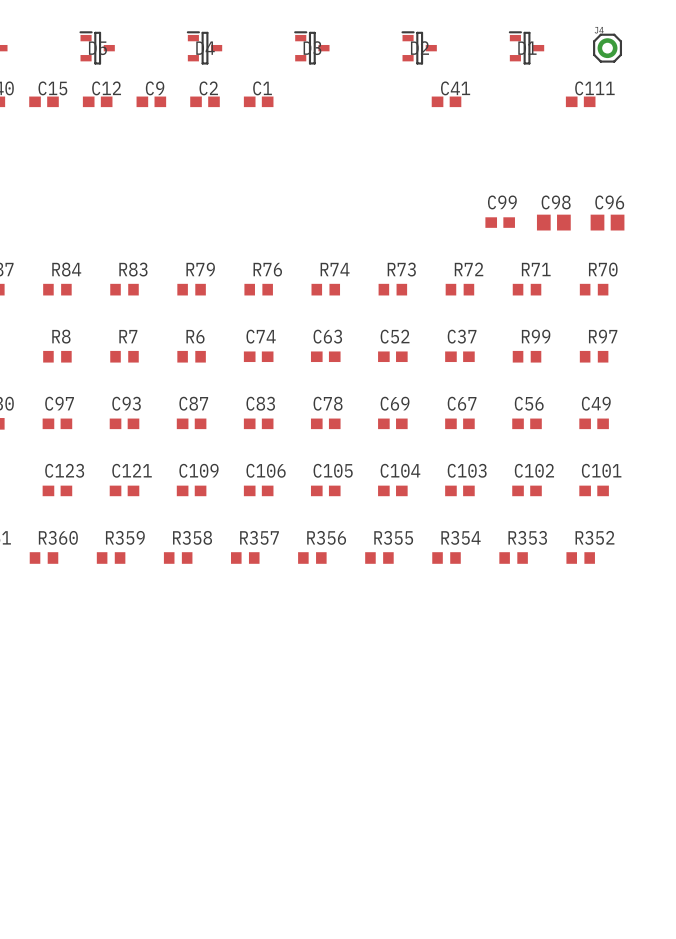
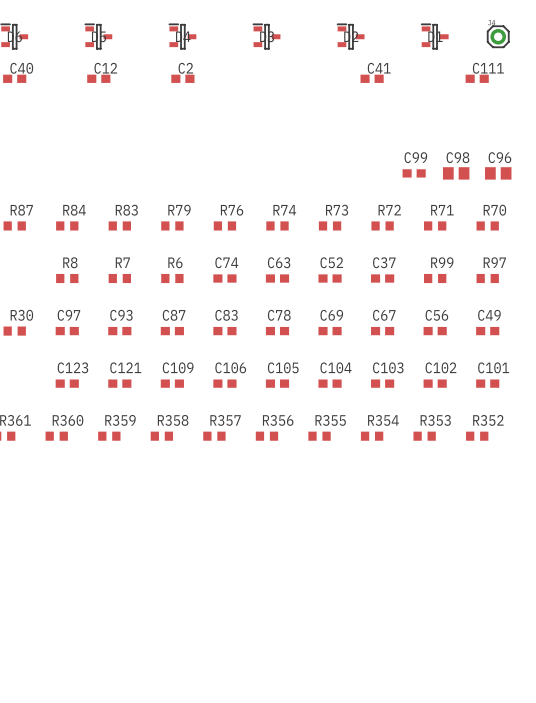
C15: (44, 101) -> none
C9: (151, 101) -> none
C1: (258, 101) -> none

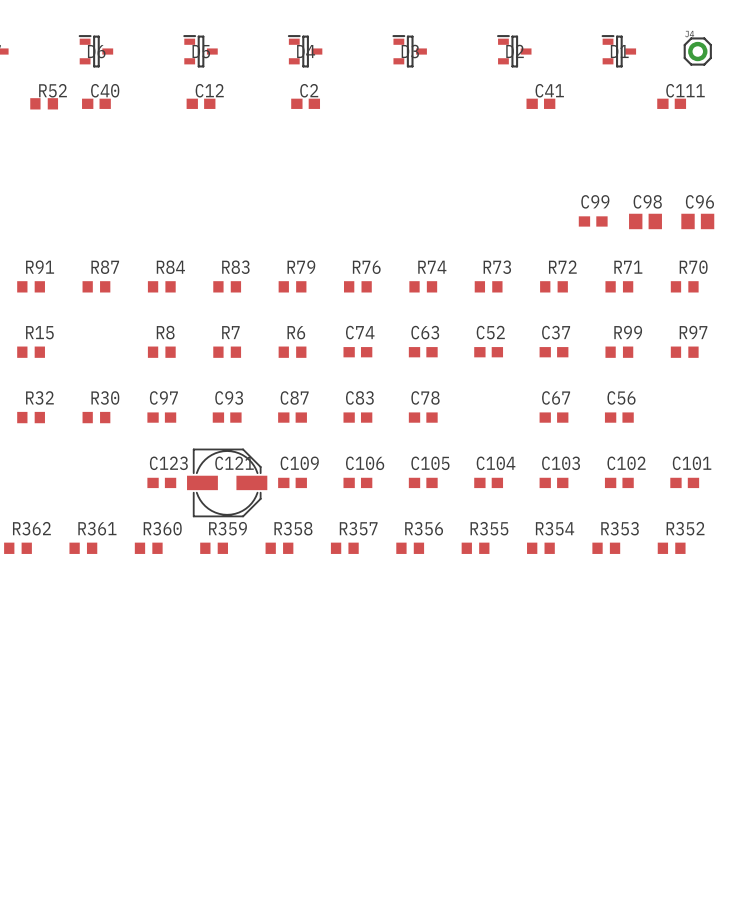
C69: (330, 331) -> none
C49: (487, 331) -> none
C121 footprint: [108, 379, 132, 388] -> [187, 448, 268, 517]

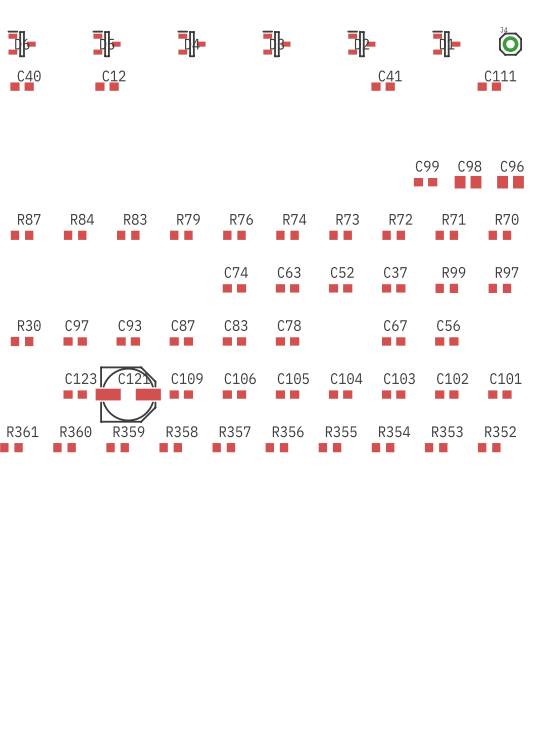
C2: (305, 103) -> none
R8: (161, 352) -> none
R7: (227, 352) -> none
R6: (292, 352) -> none

